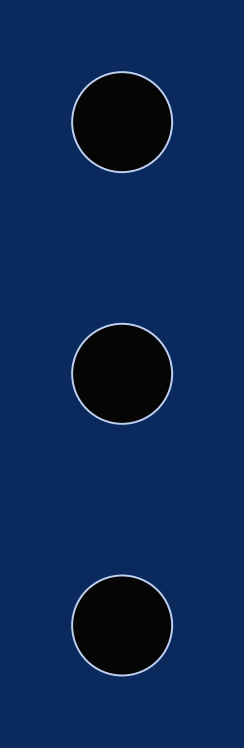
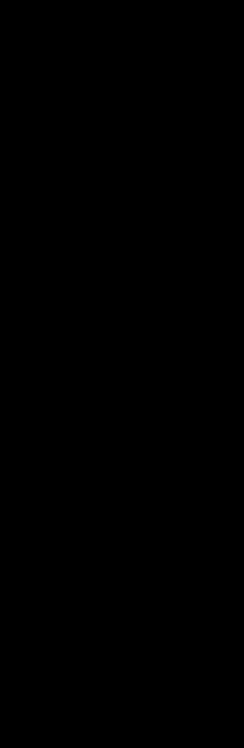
part: (122, 122) -> none
part: (122, 373) -> none
part: (122, 625) -> none

